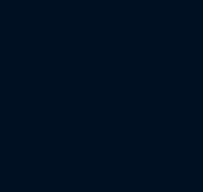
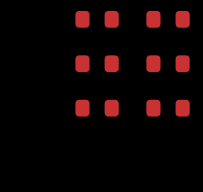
part: none -> (97, 19)
part: none -> (168, 19)
part: none -> (97, 63)
part: none -> (168, 63)
part: none -> (97, 108)
part: none -> (168, 108)

